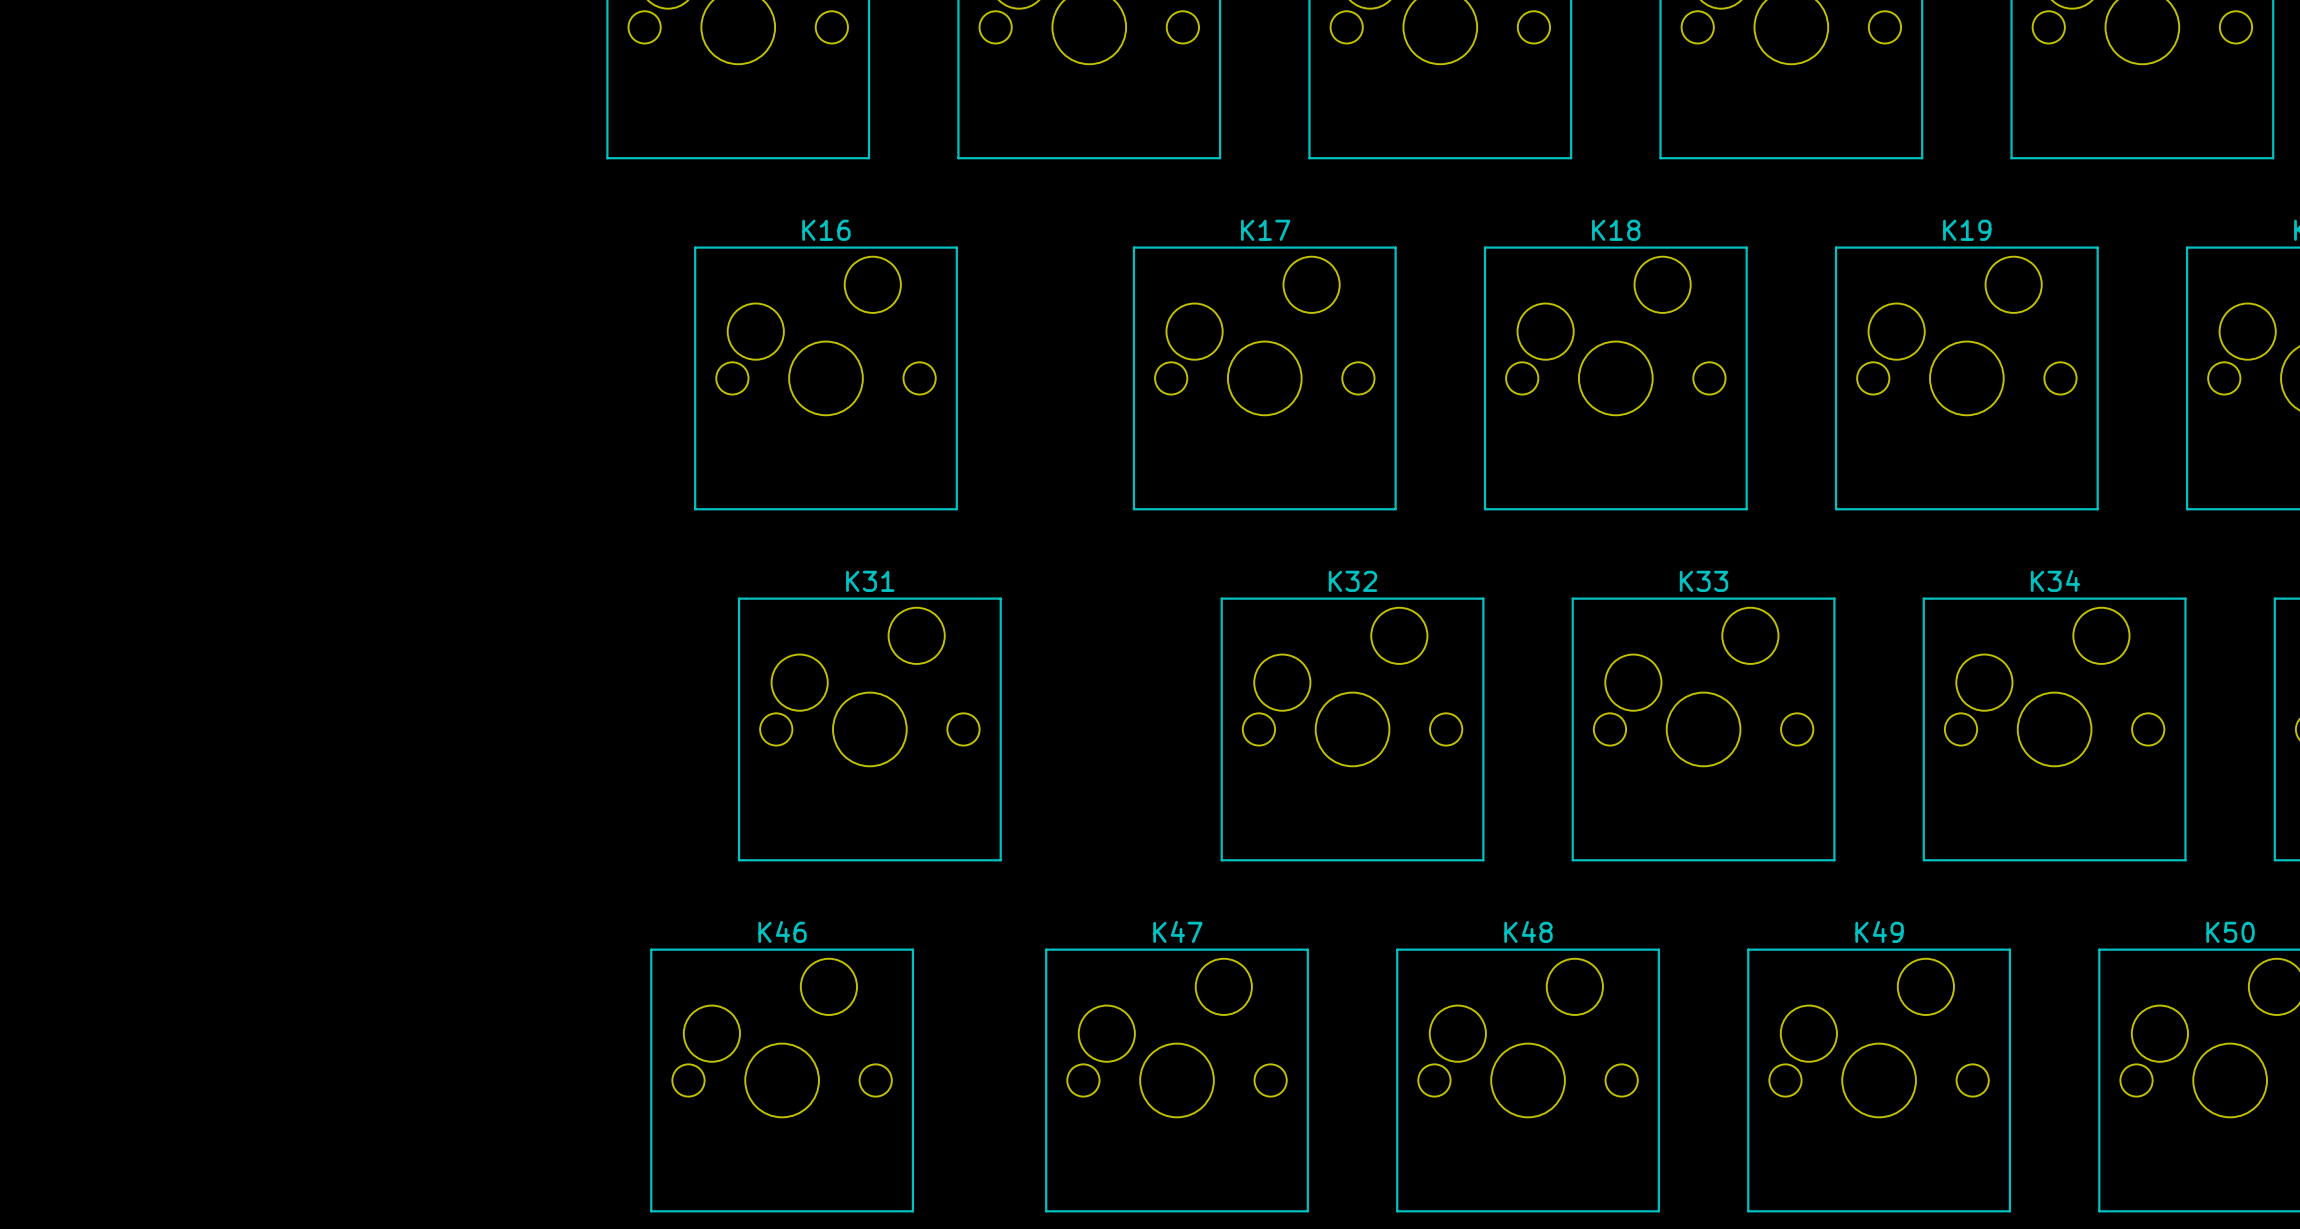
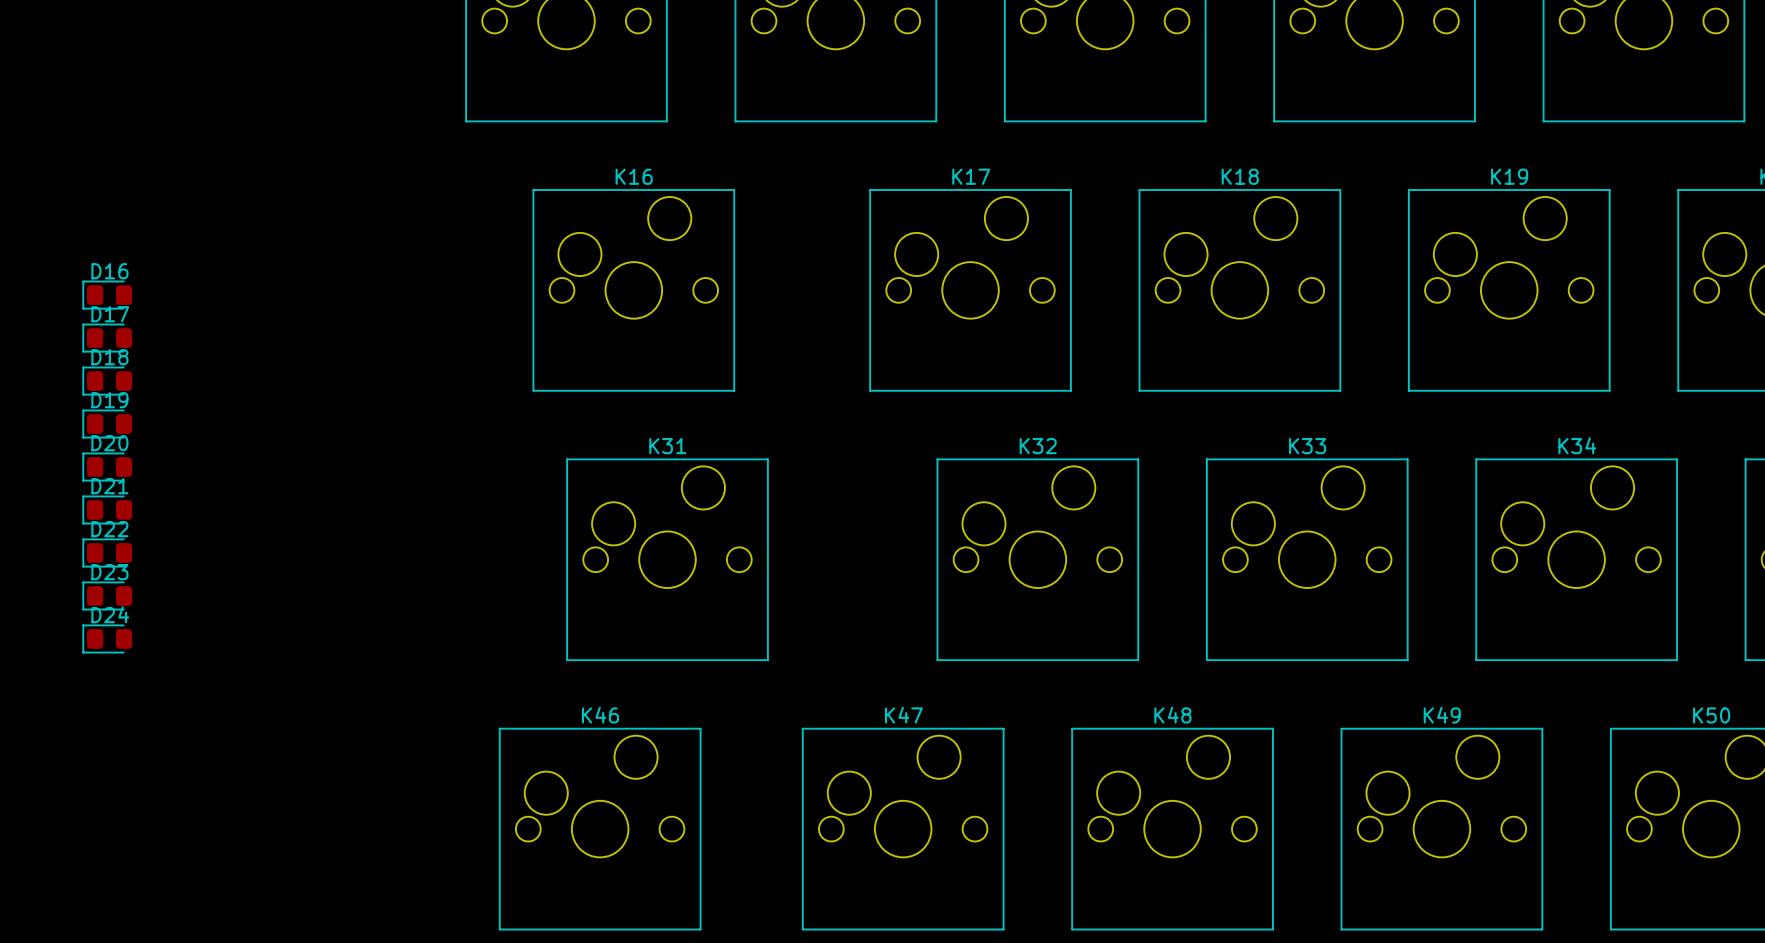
D16: none -> (107, 295)
D17: none -> (107, 338)
D18: none -> (107, 381)
D19: none -> (107, 424)
D20: none -> (107, 467)
D21: none -> (107, 510)
D22: none -> (107, 552)
D23: none -> (107, 595)
D24: none -> (107, 638)

